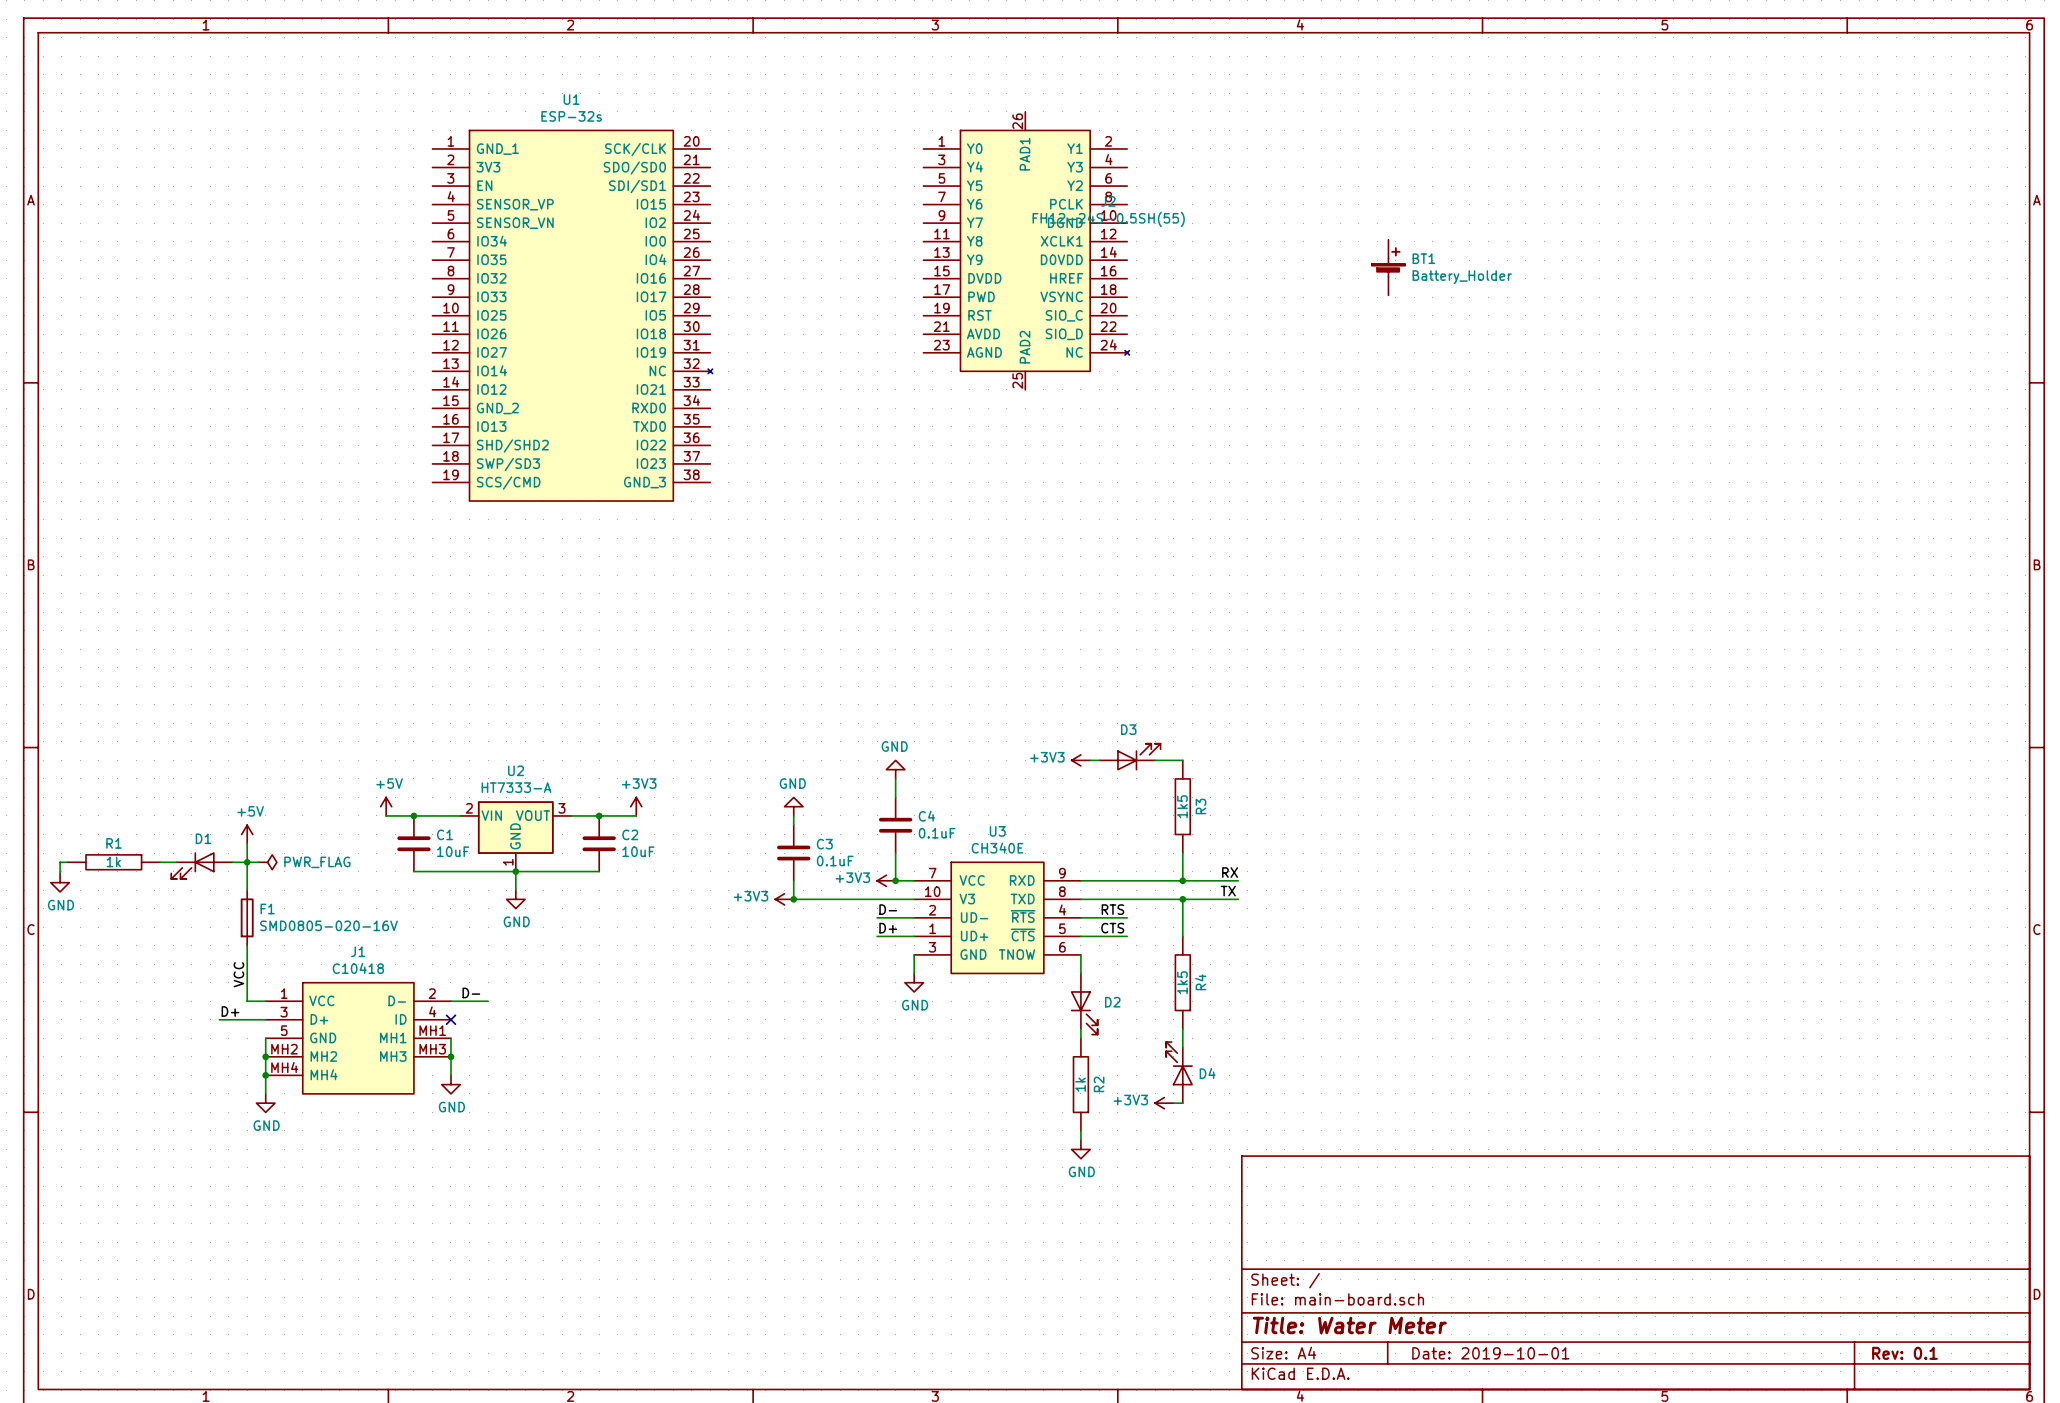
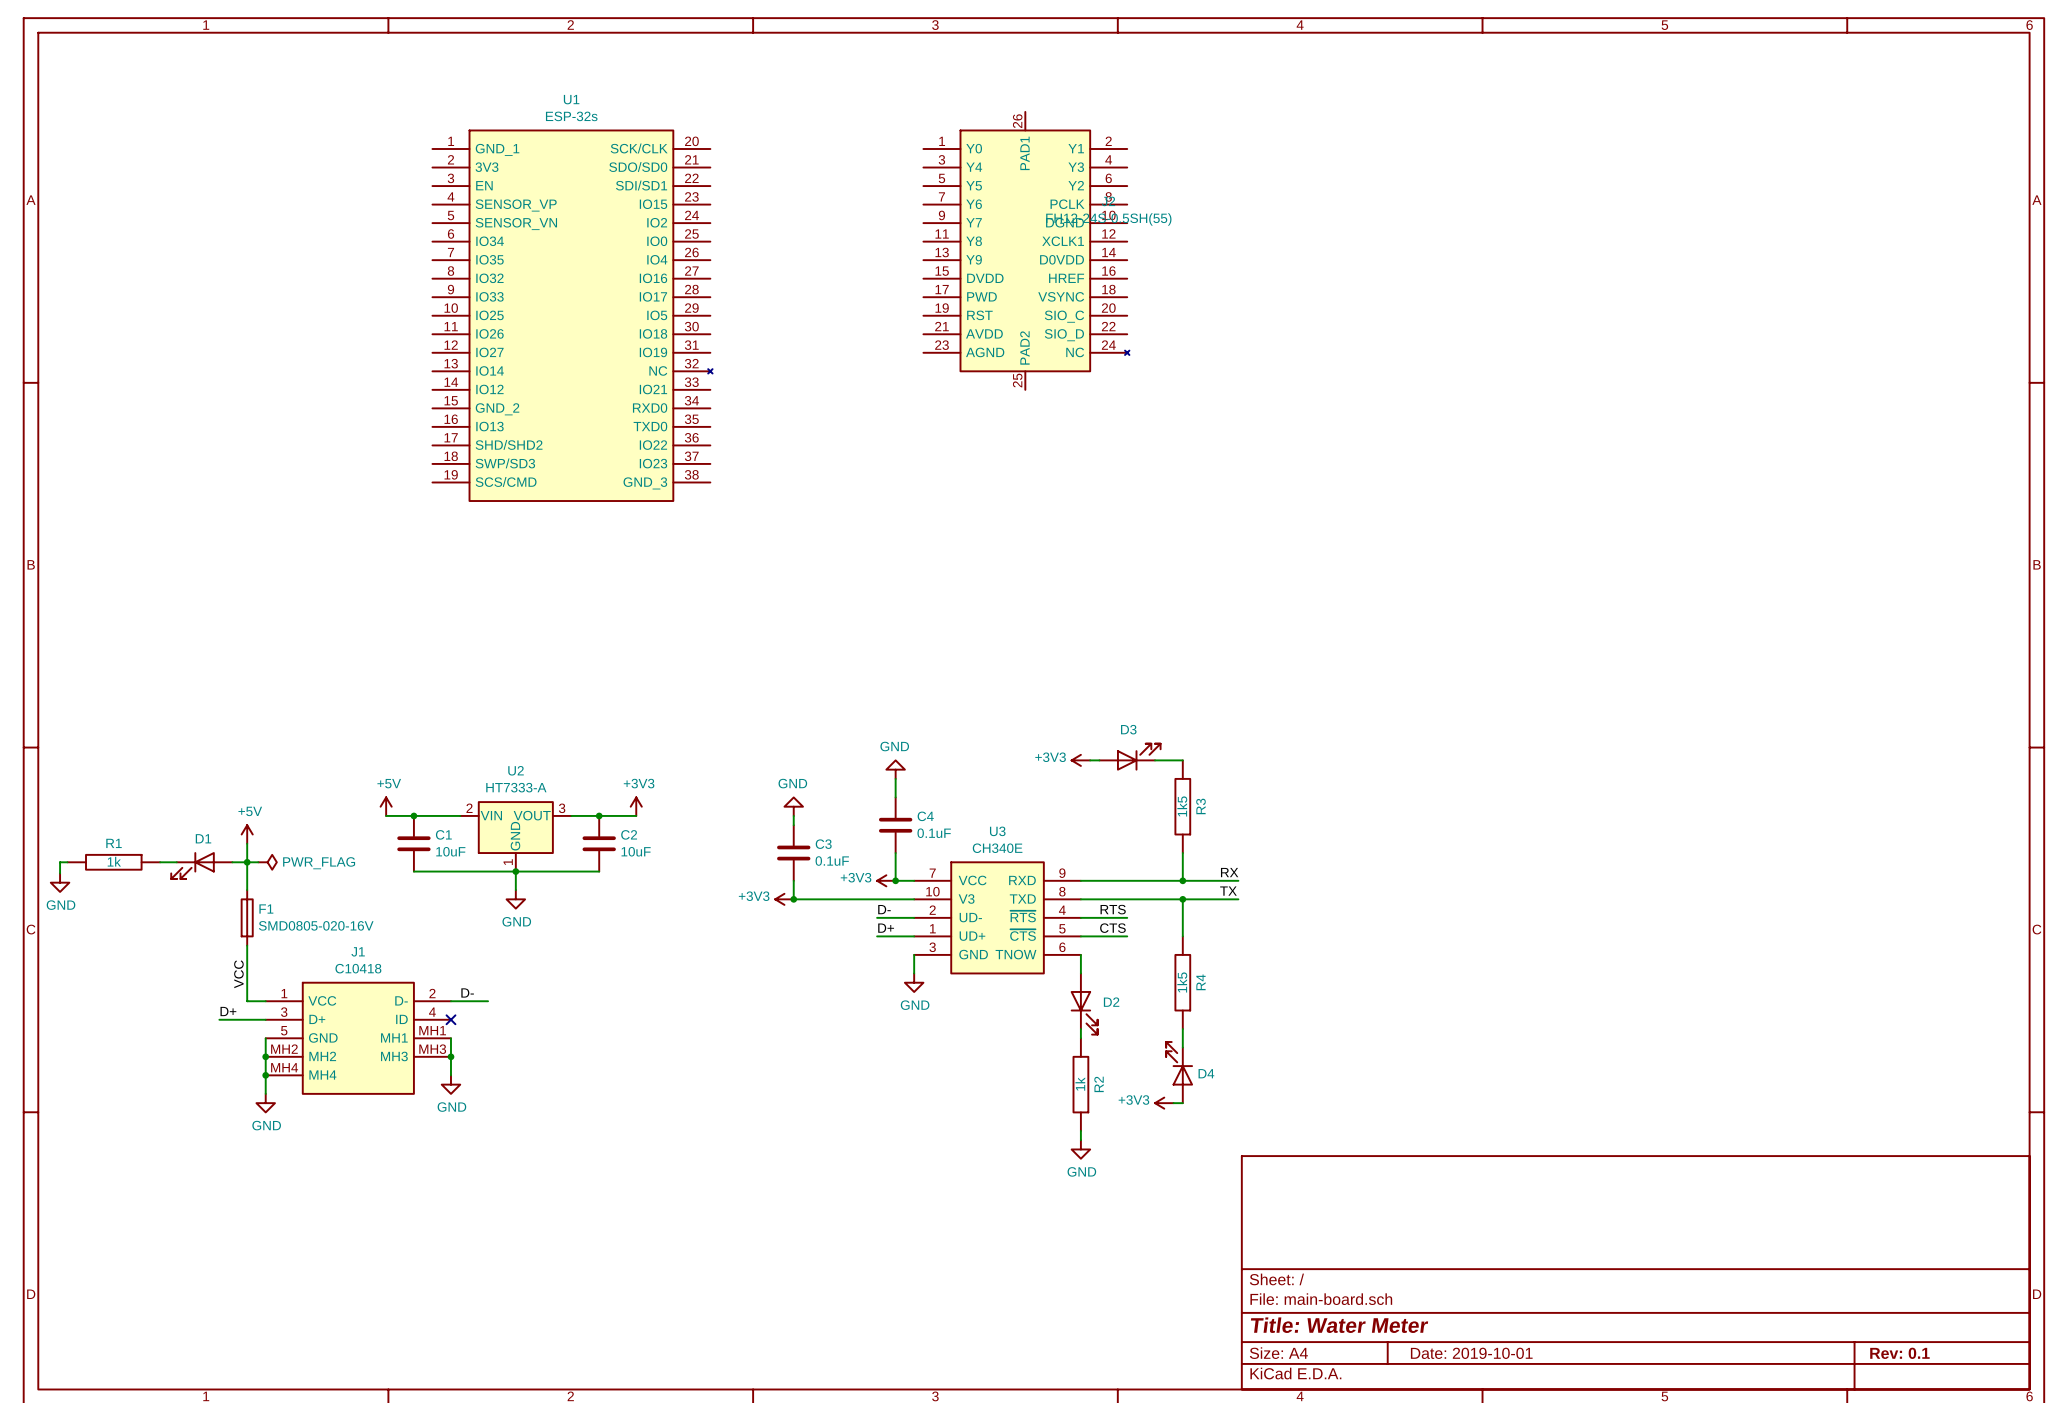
BT1: Battery_Holder (1388, 267) -> none

